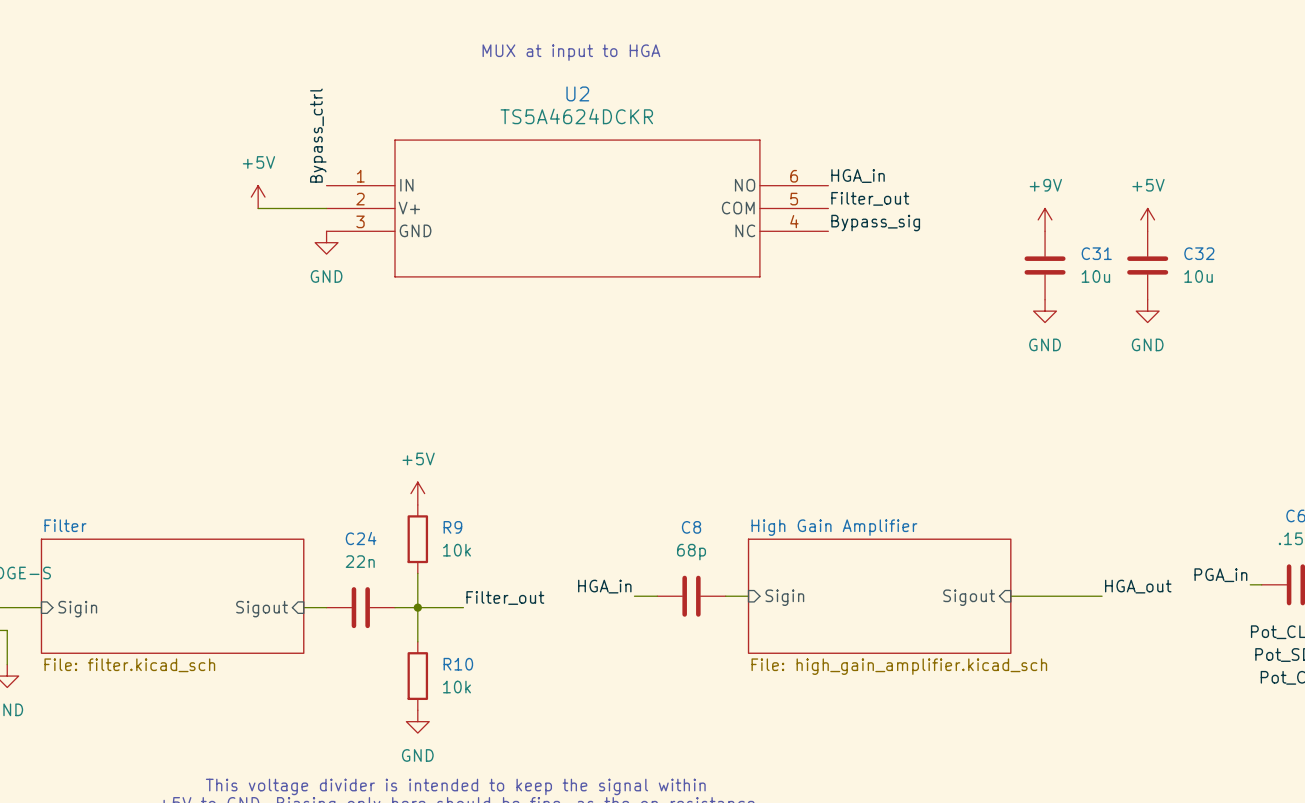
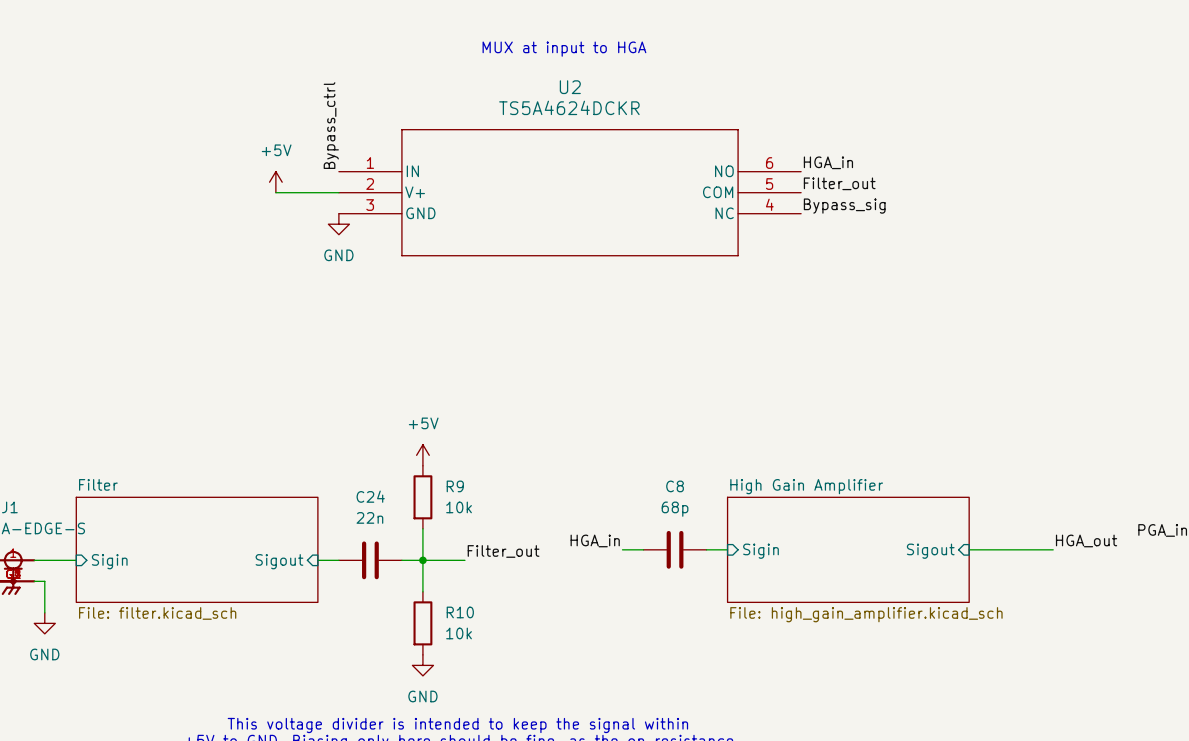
power symbol: +9V (1045, 219) -> none
power symbol: +5V (1147, 219) -> none
C31: 10u (1045, 265) -> none
C32: 10u (1147, 265) -> none
power symbol: GND (1045, 311) -> none
power symbol: GND (1147, 311) -> none

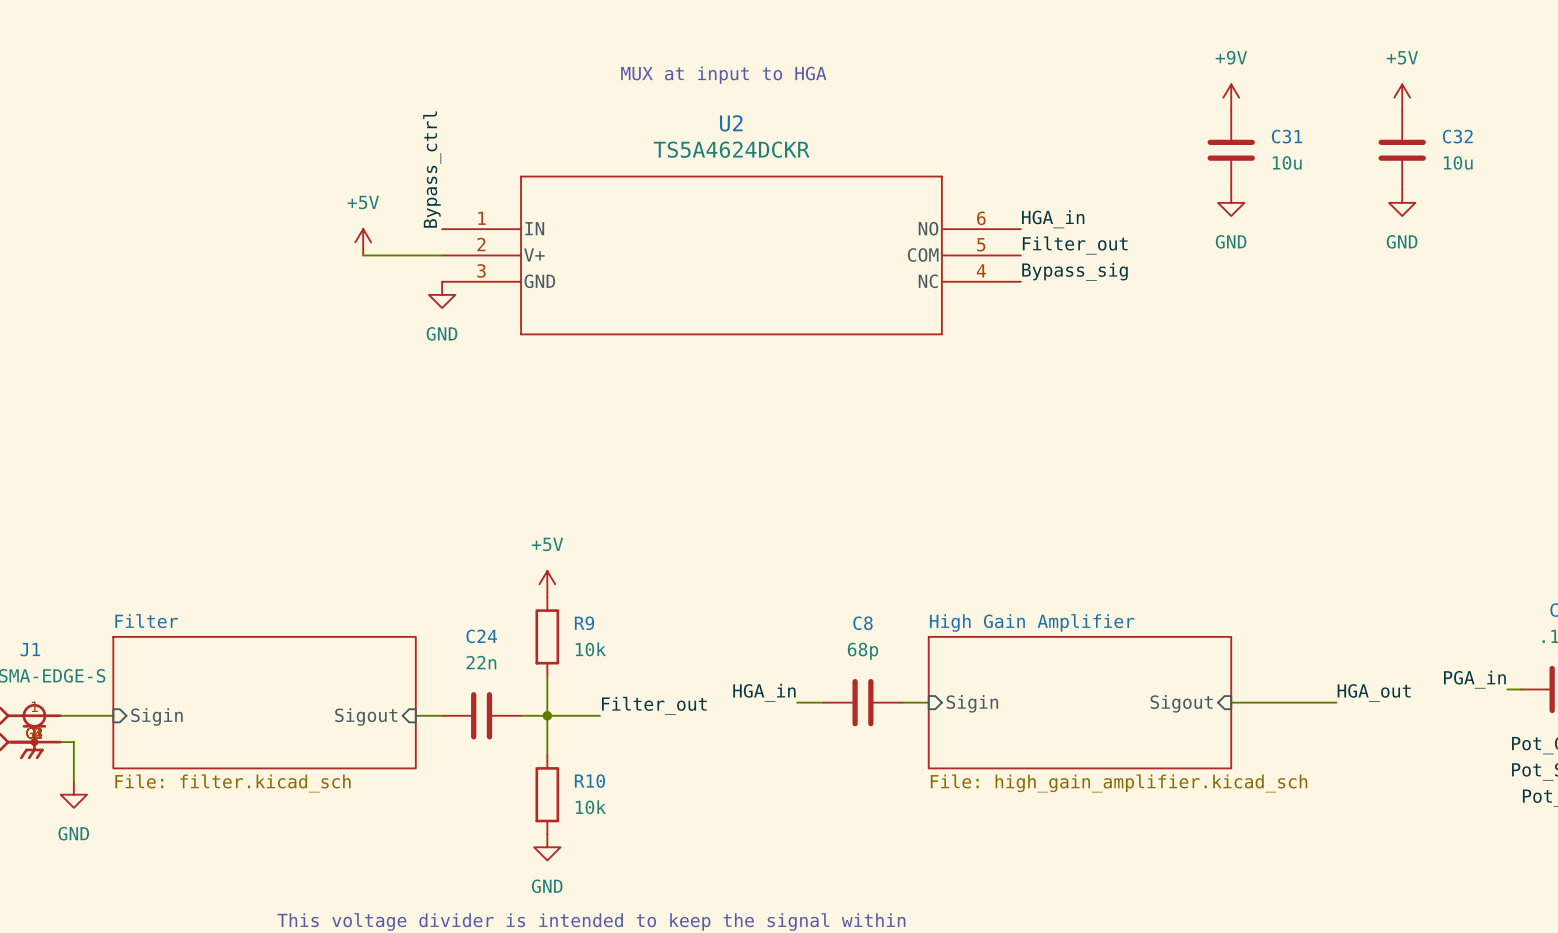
power symbol: none -> +9V (1231, 97)
power symbol: none -> +5V (1402, 97)
C31: none -> 10u (1231, 150)
C32: none -> 10u (1402, 150)
power symbol: none -> GND (1231, 202)
power symbol: none -> GND (1402, 202)

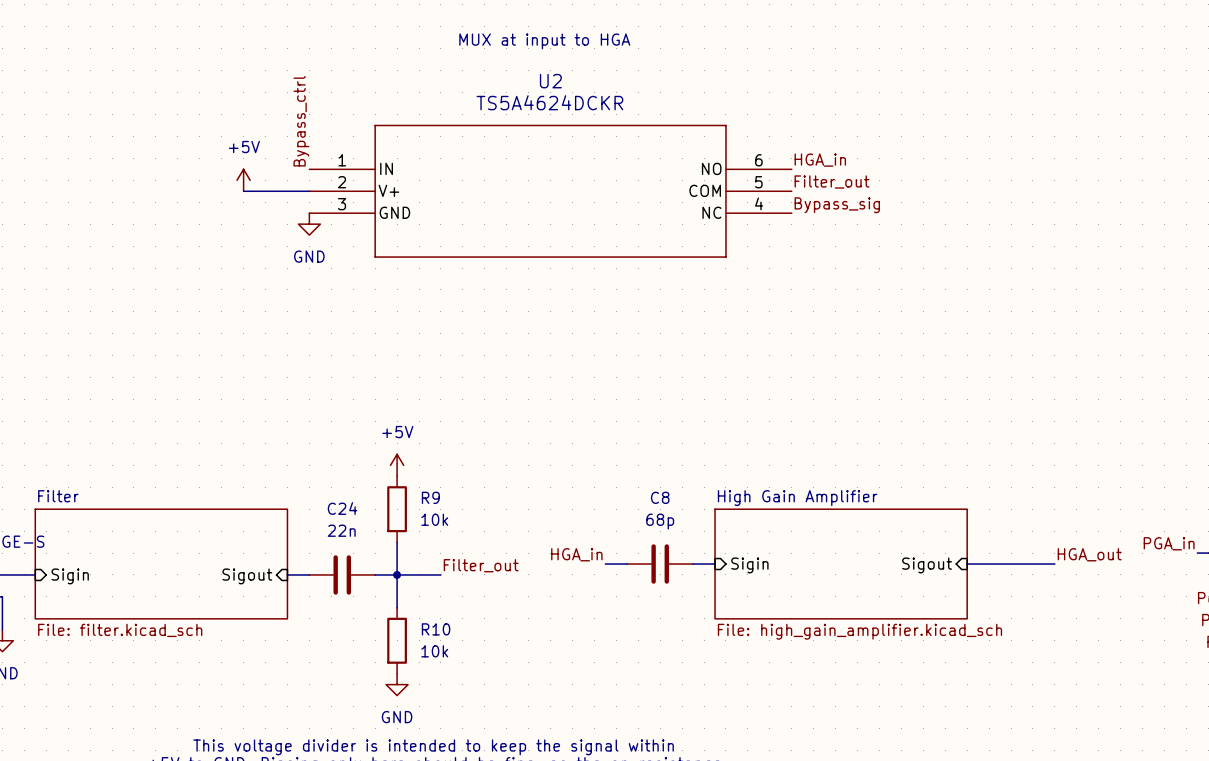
power symbol: +9V (1231, 97) -> none
power symbol: +5V (1402, 97) -> none
C31: 10u (1231, 150) -> none
C32: 10u (1402, 150) -> none
power symbol: GND (1231, 202) -> none
power symbol: GND (1402, 202) -> none

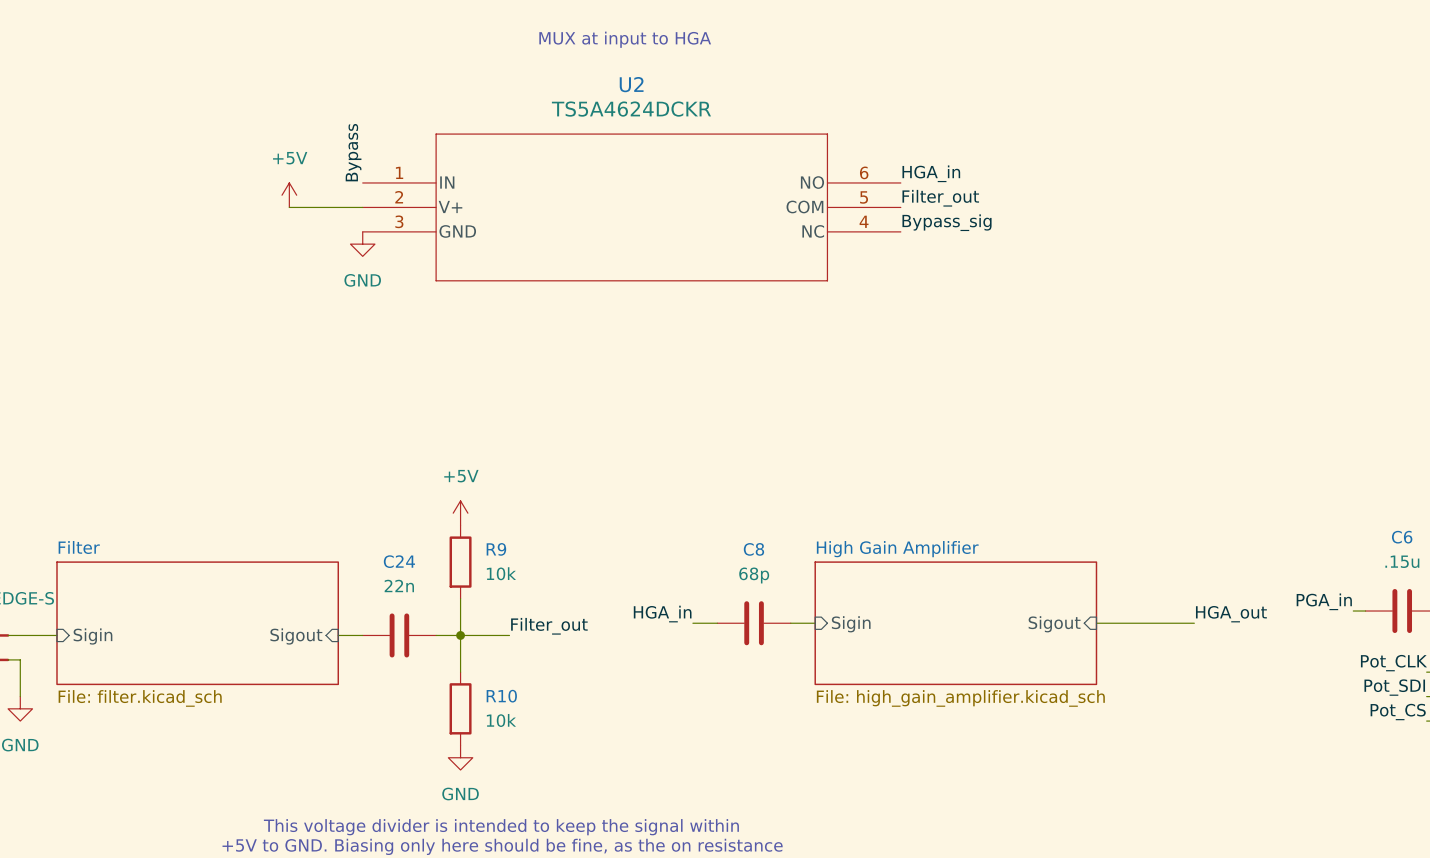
label: Bypass_ctrl (301, 121) -> Bypass (353, 152)

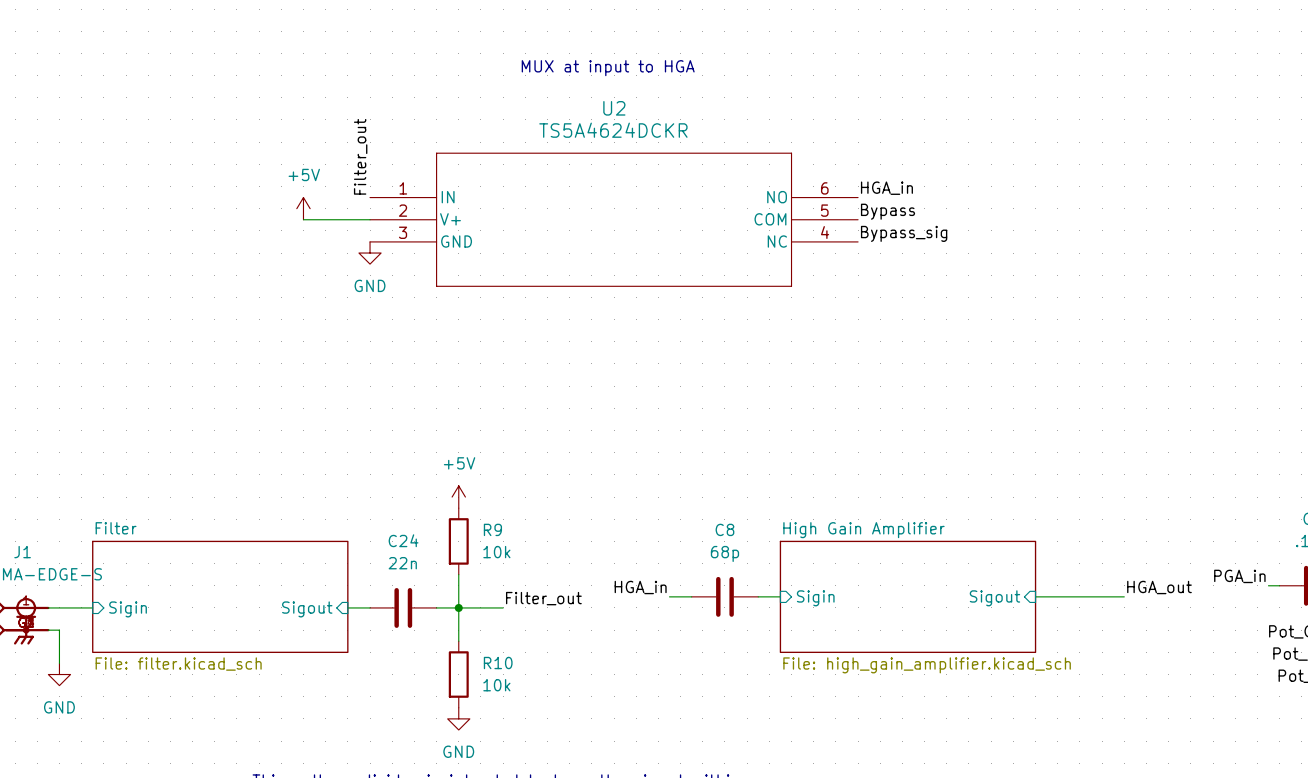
label: Bypass (353, 152) -> Filter_out (360, 156)
label: Filter_out (940, 198) -> Bypass (888, 211)

